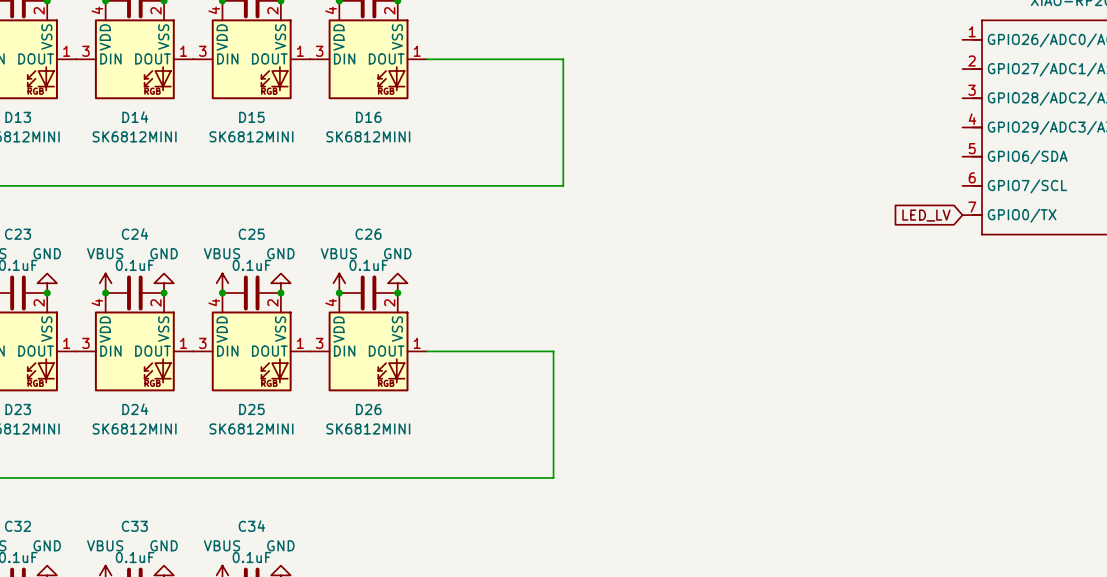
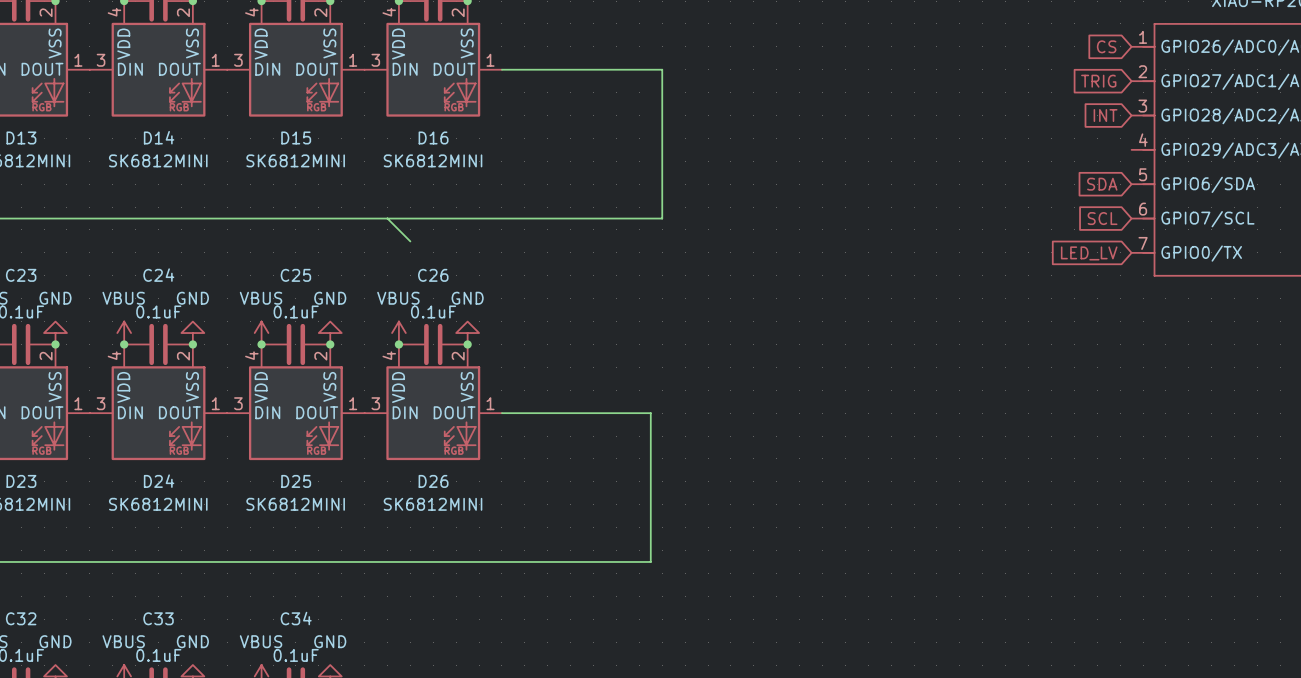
global label: none -> CS (1106, 46)
global label: none -> TRIG (1098, 81)
global label: none -> INT (1105, 115)
global label: none -> SDA (1102, 184)
wire: none -> (387, 218) (410, 241)
global label: none -> SCL (1102, 218)

